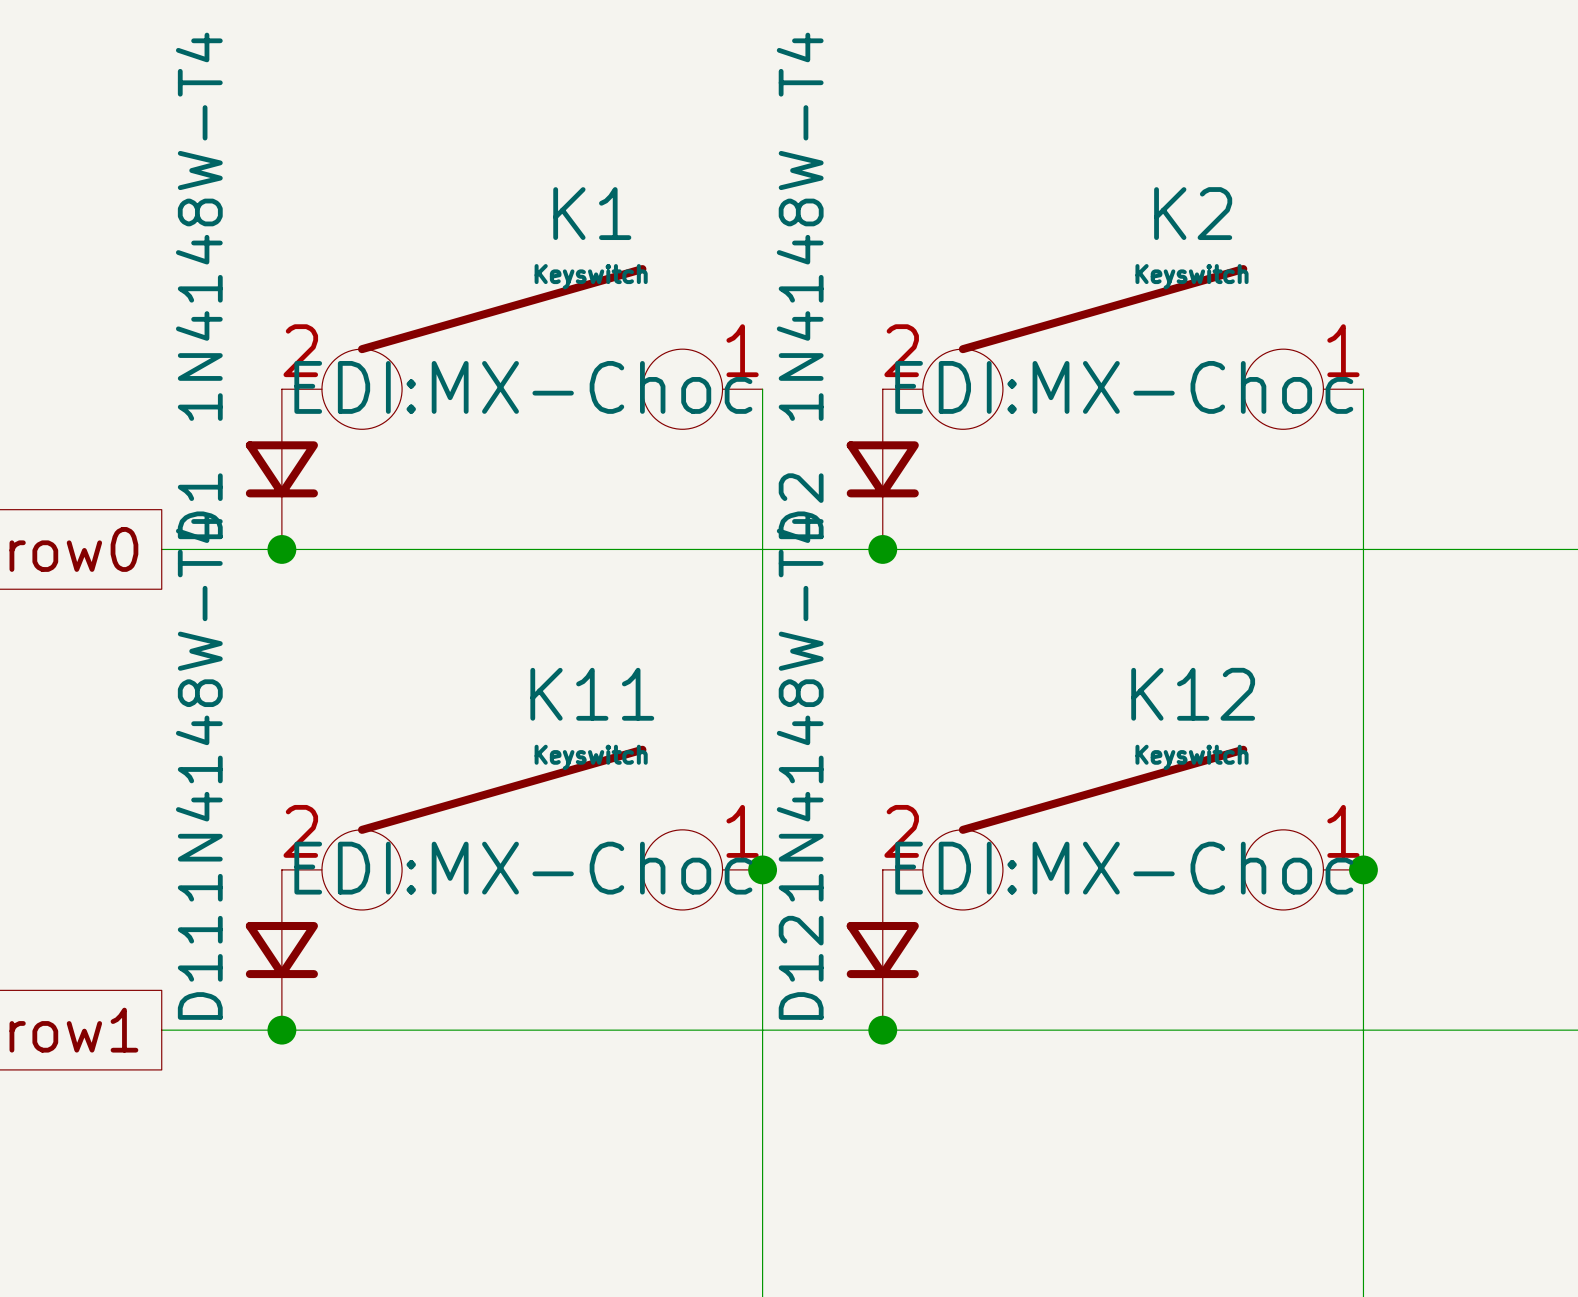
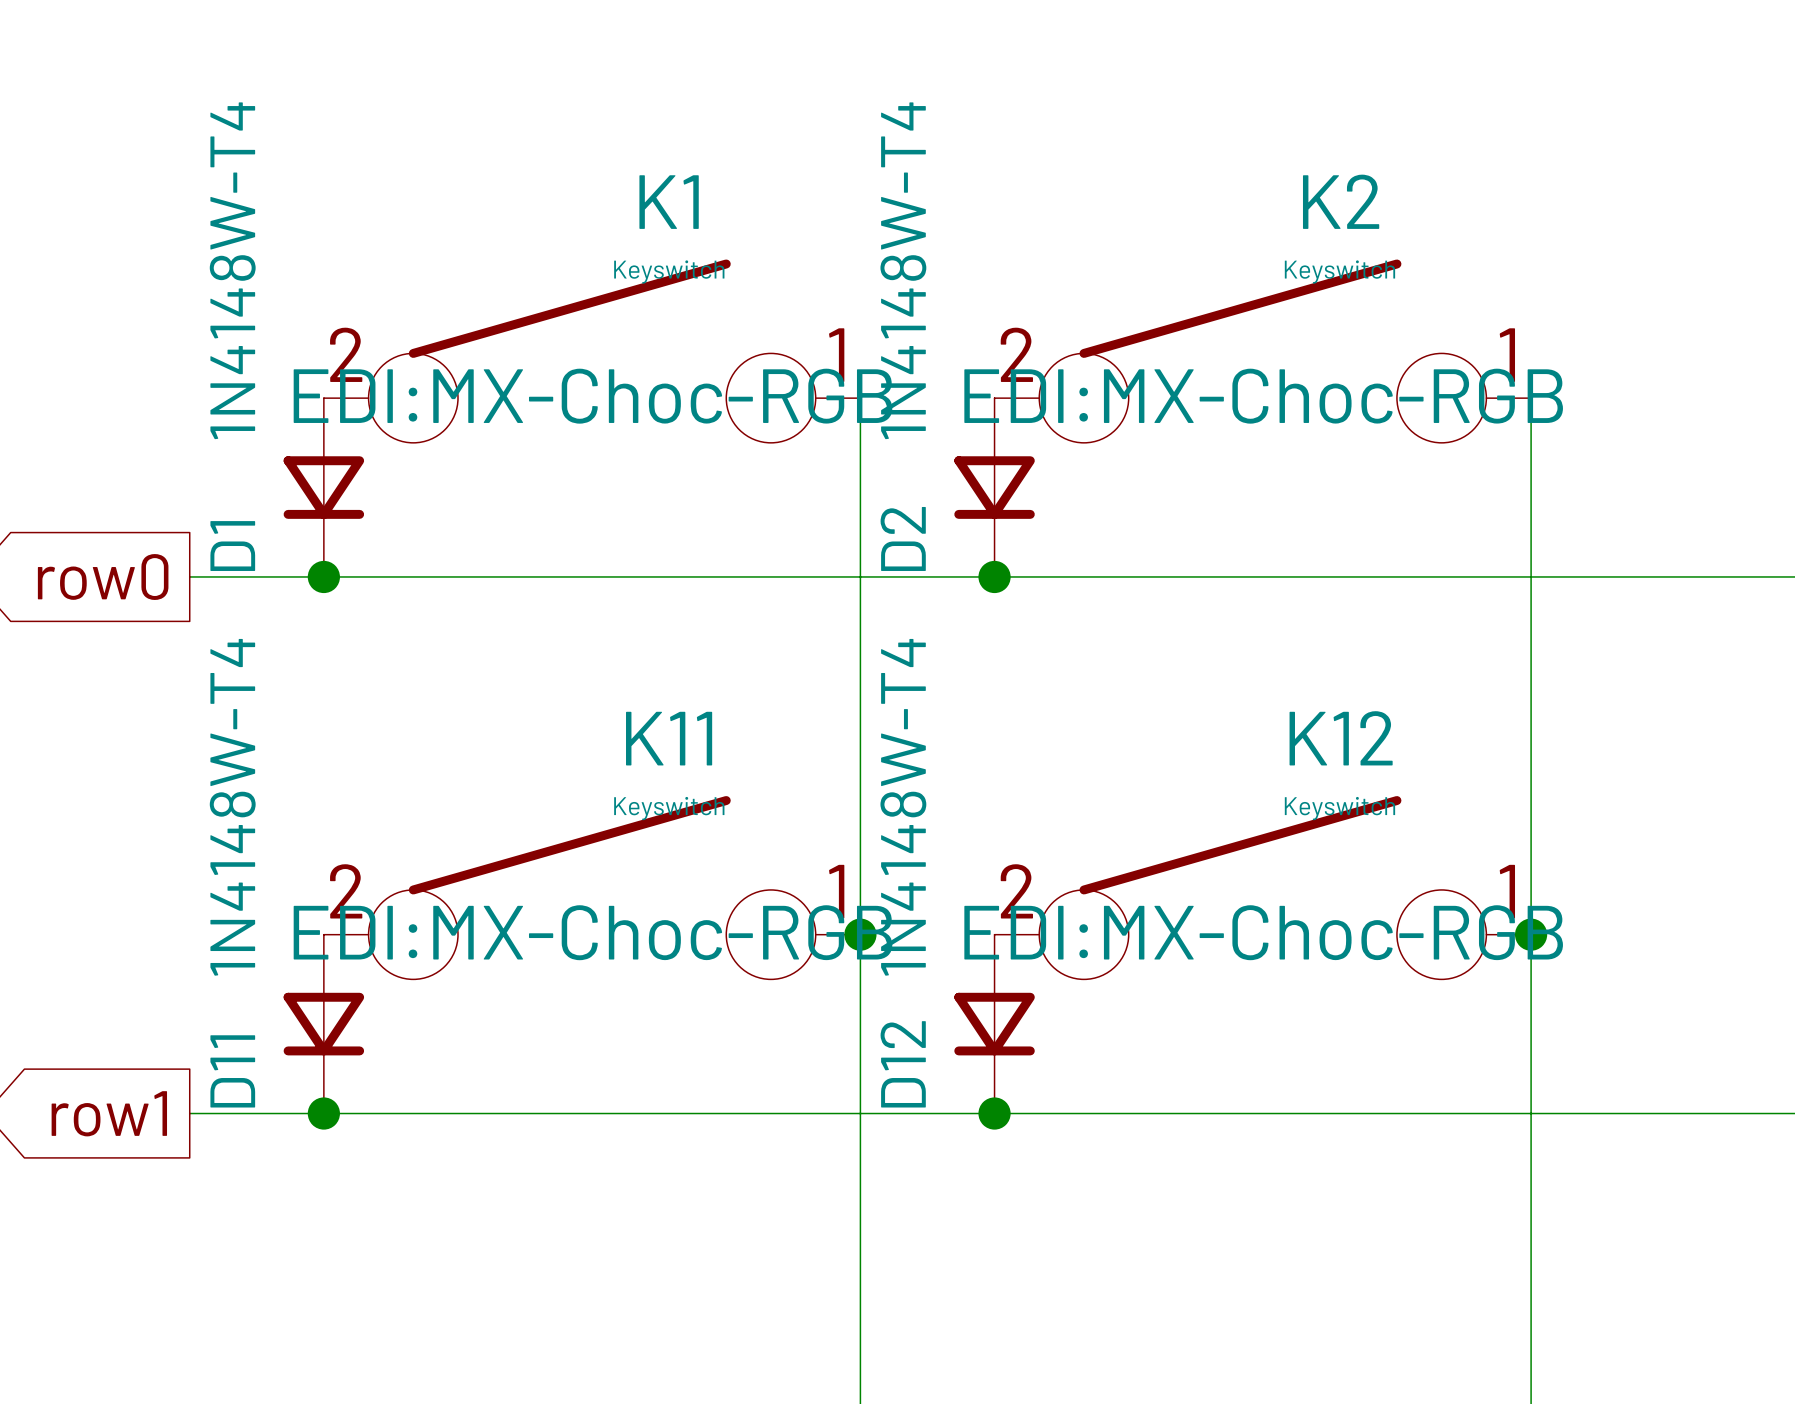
K1 text: EDI:MX-Choc (523, 387) -> EDI:MX-Choc-RGB (592, 396)
K2 text: EDI:MX-Choc (1124, 387) -> EDI:MX-Choc-RGB (1263, 396)
K11 text: EDI:MX-Choc (523, 868) -> EDI:MX-Choc-RGB (592, 932)
K12 text: EDI:MX-Choc (1124, 868) -> EDI:MX-Choc-RGB (1263, 932)

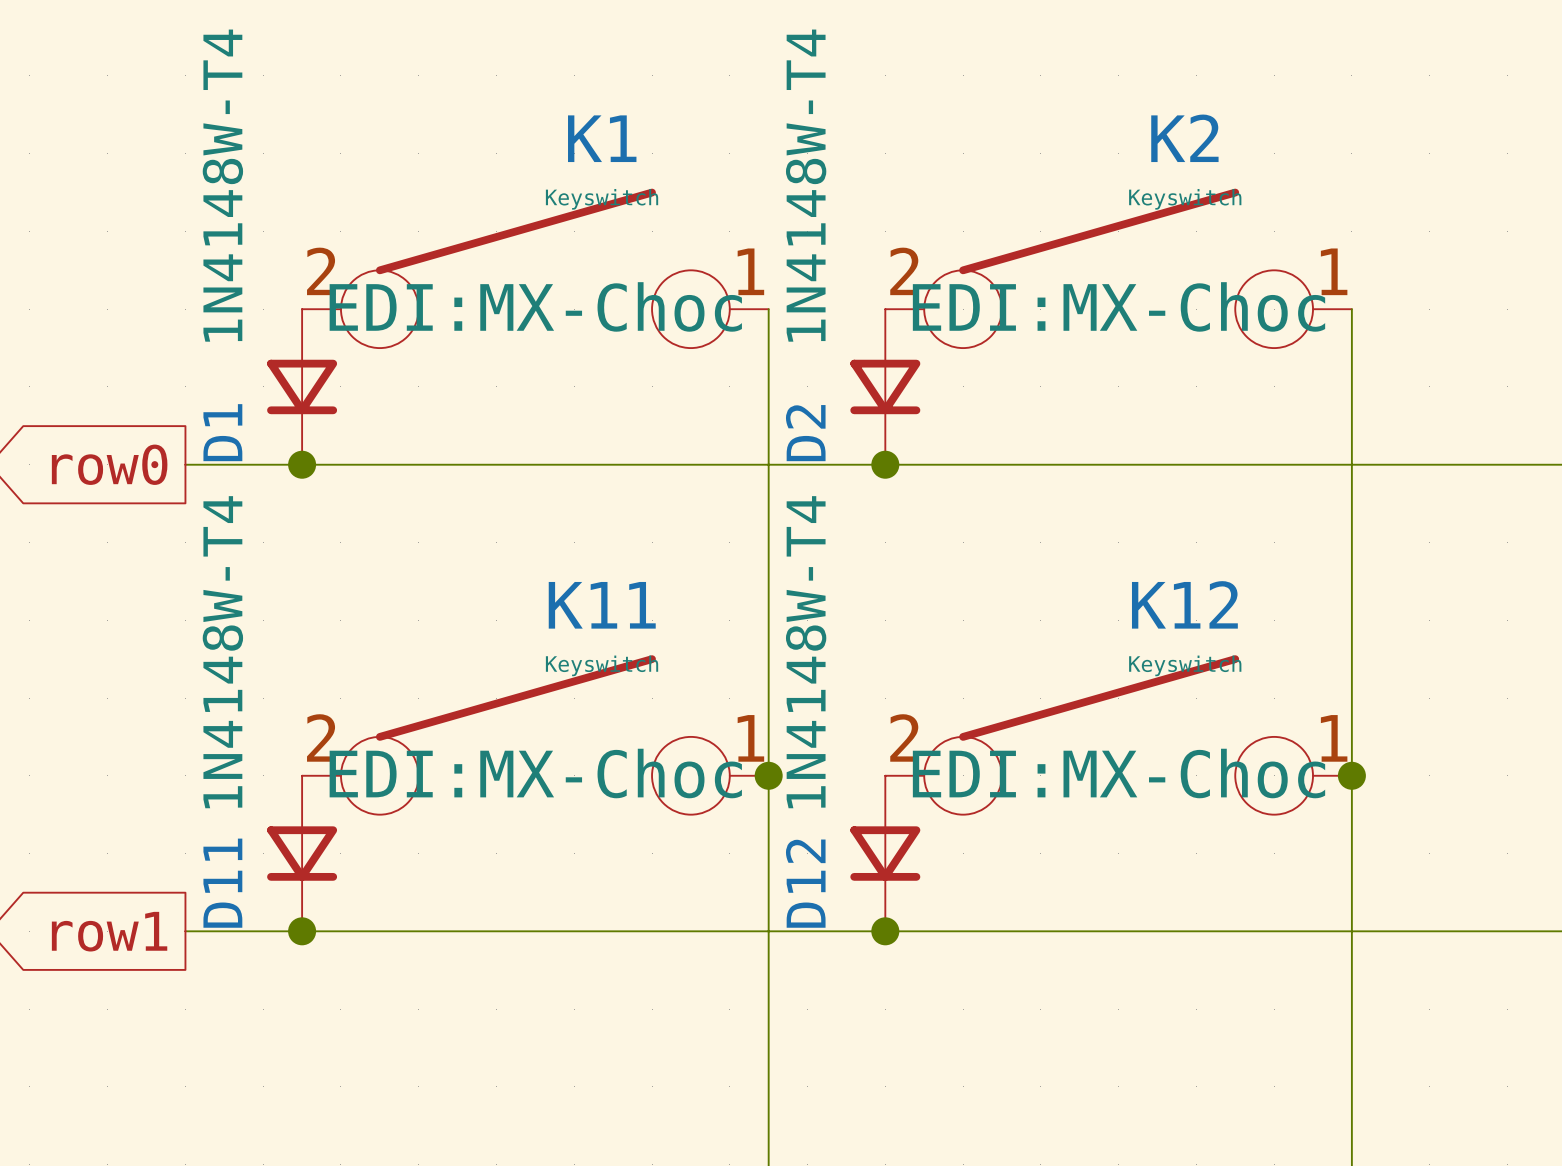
K1 text: EDI:MX-Choc-RGB (592, 396) -> EDI:MX-Choc (535, 306)
K2 text: EDI:MX-Choc-RGB (1263, 396) -> EDI:MX-Choc (1119, 306)
K11 text: EDI:MX-Choc-RGB (592, 932) -> EDI:MX-Choc (535, 773)
K12 text: EDI:MX-Choc-RGB (1263, 932) -> EDI:MX-Choc (1119, 773)

